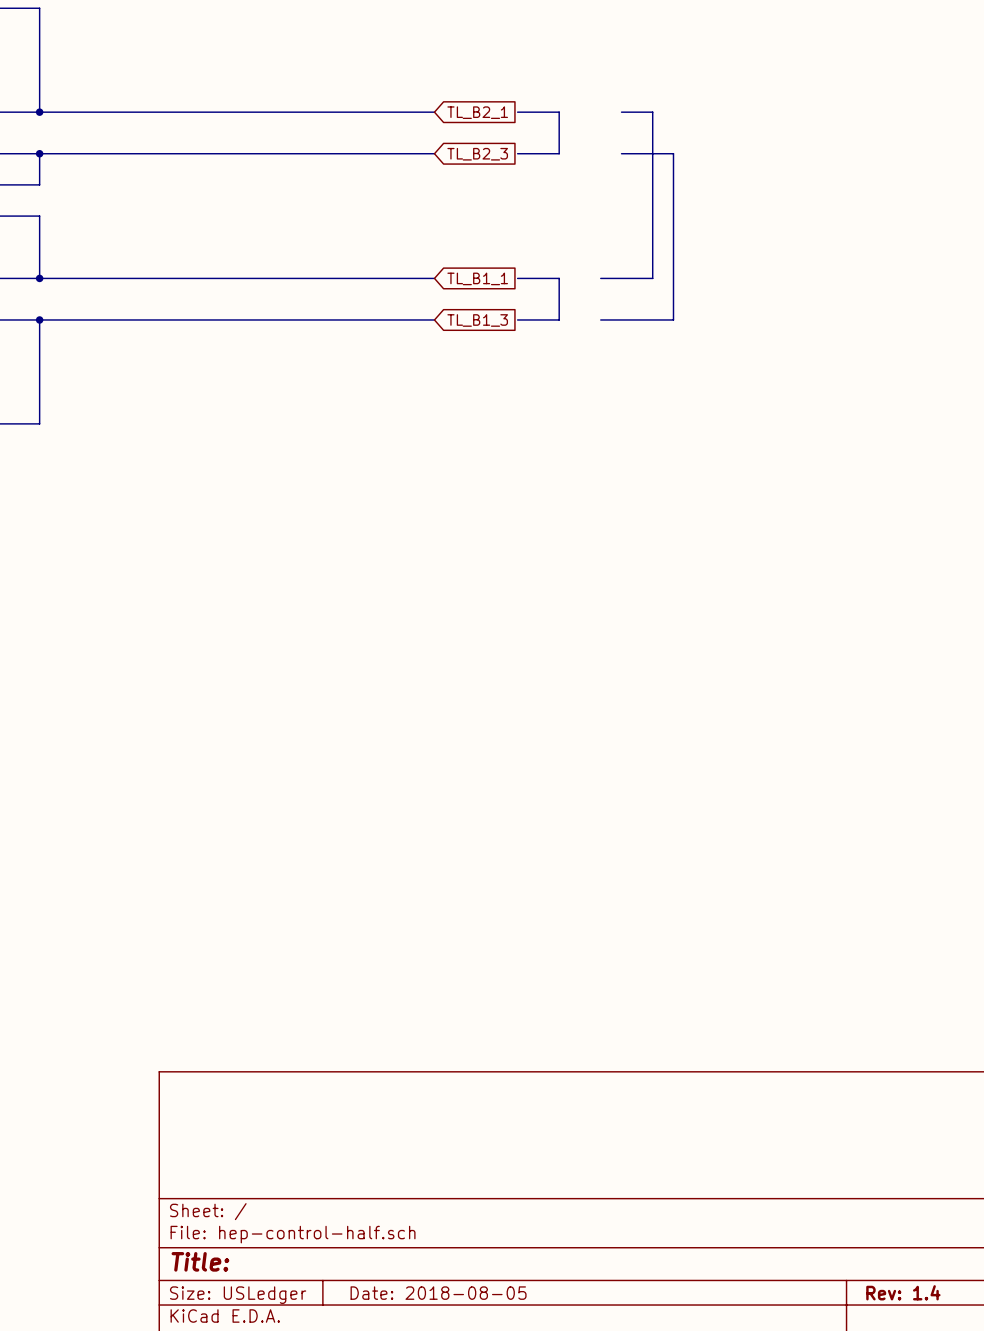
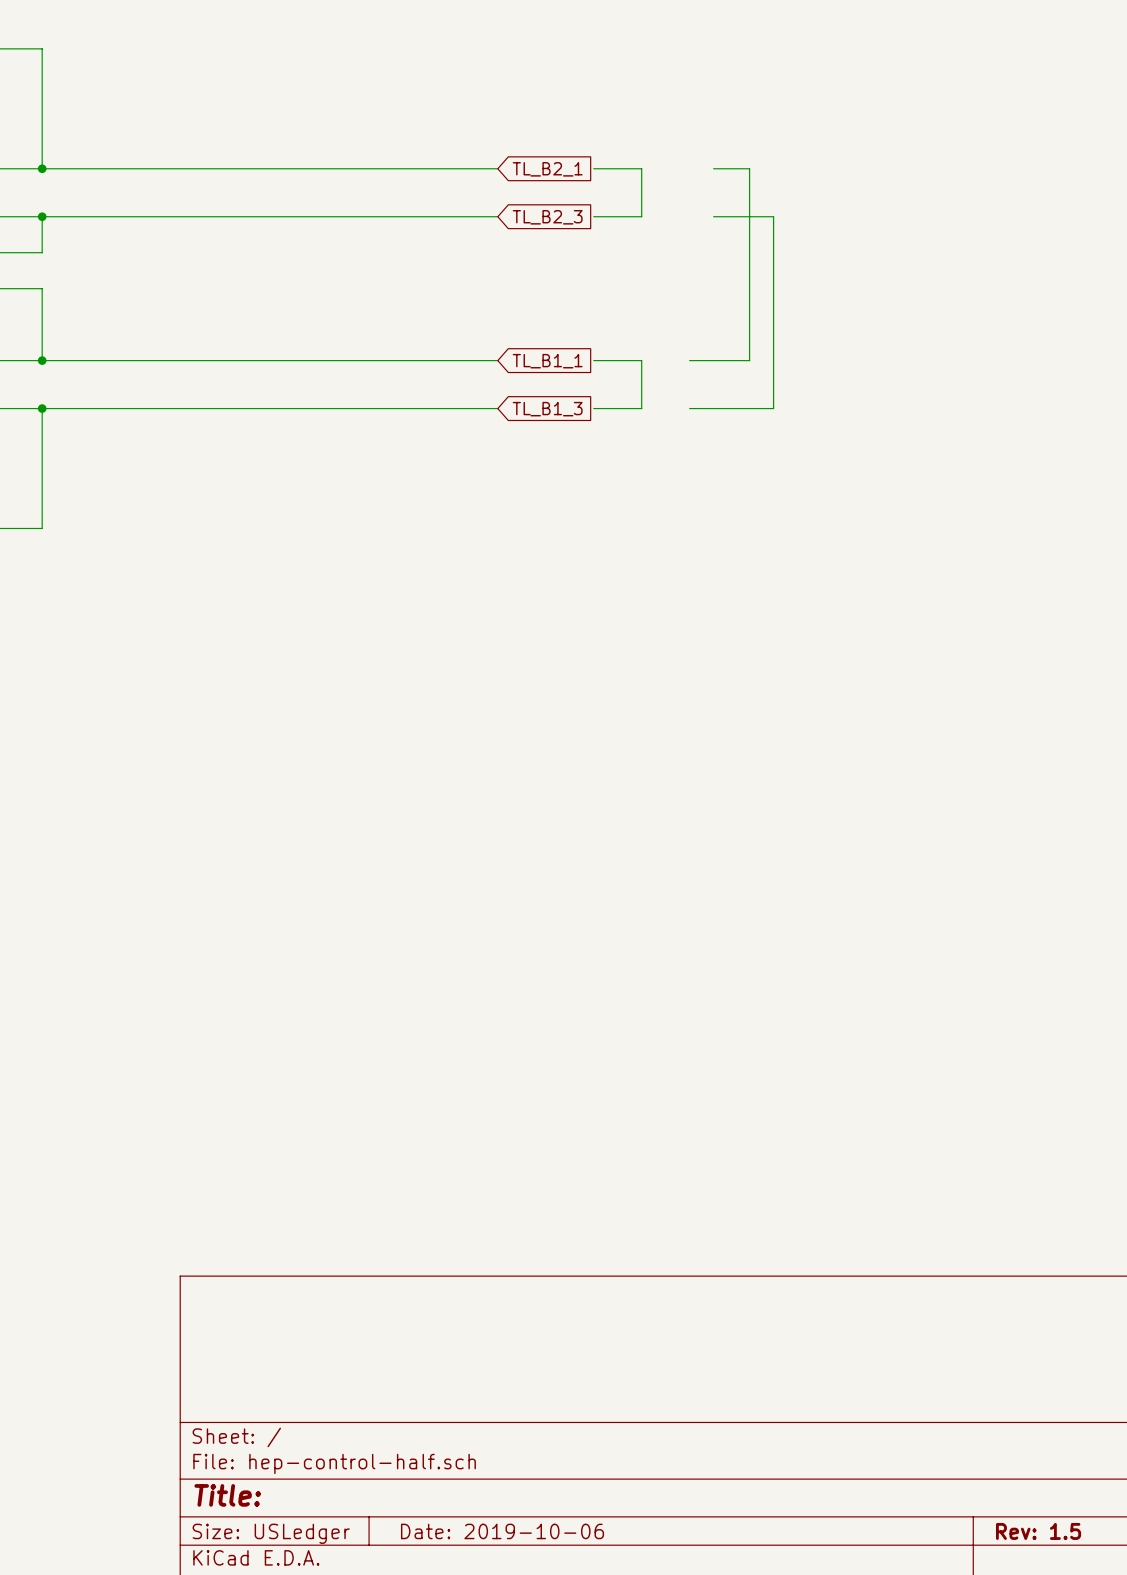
title block: Rev: 1.4 (903, 1292) -> Rev: 1.5 (1038, 1531)
title block: Date: 2018-08-05 (438, 1293) -> Date: 2019-10-06 (502, 1531)

